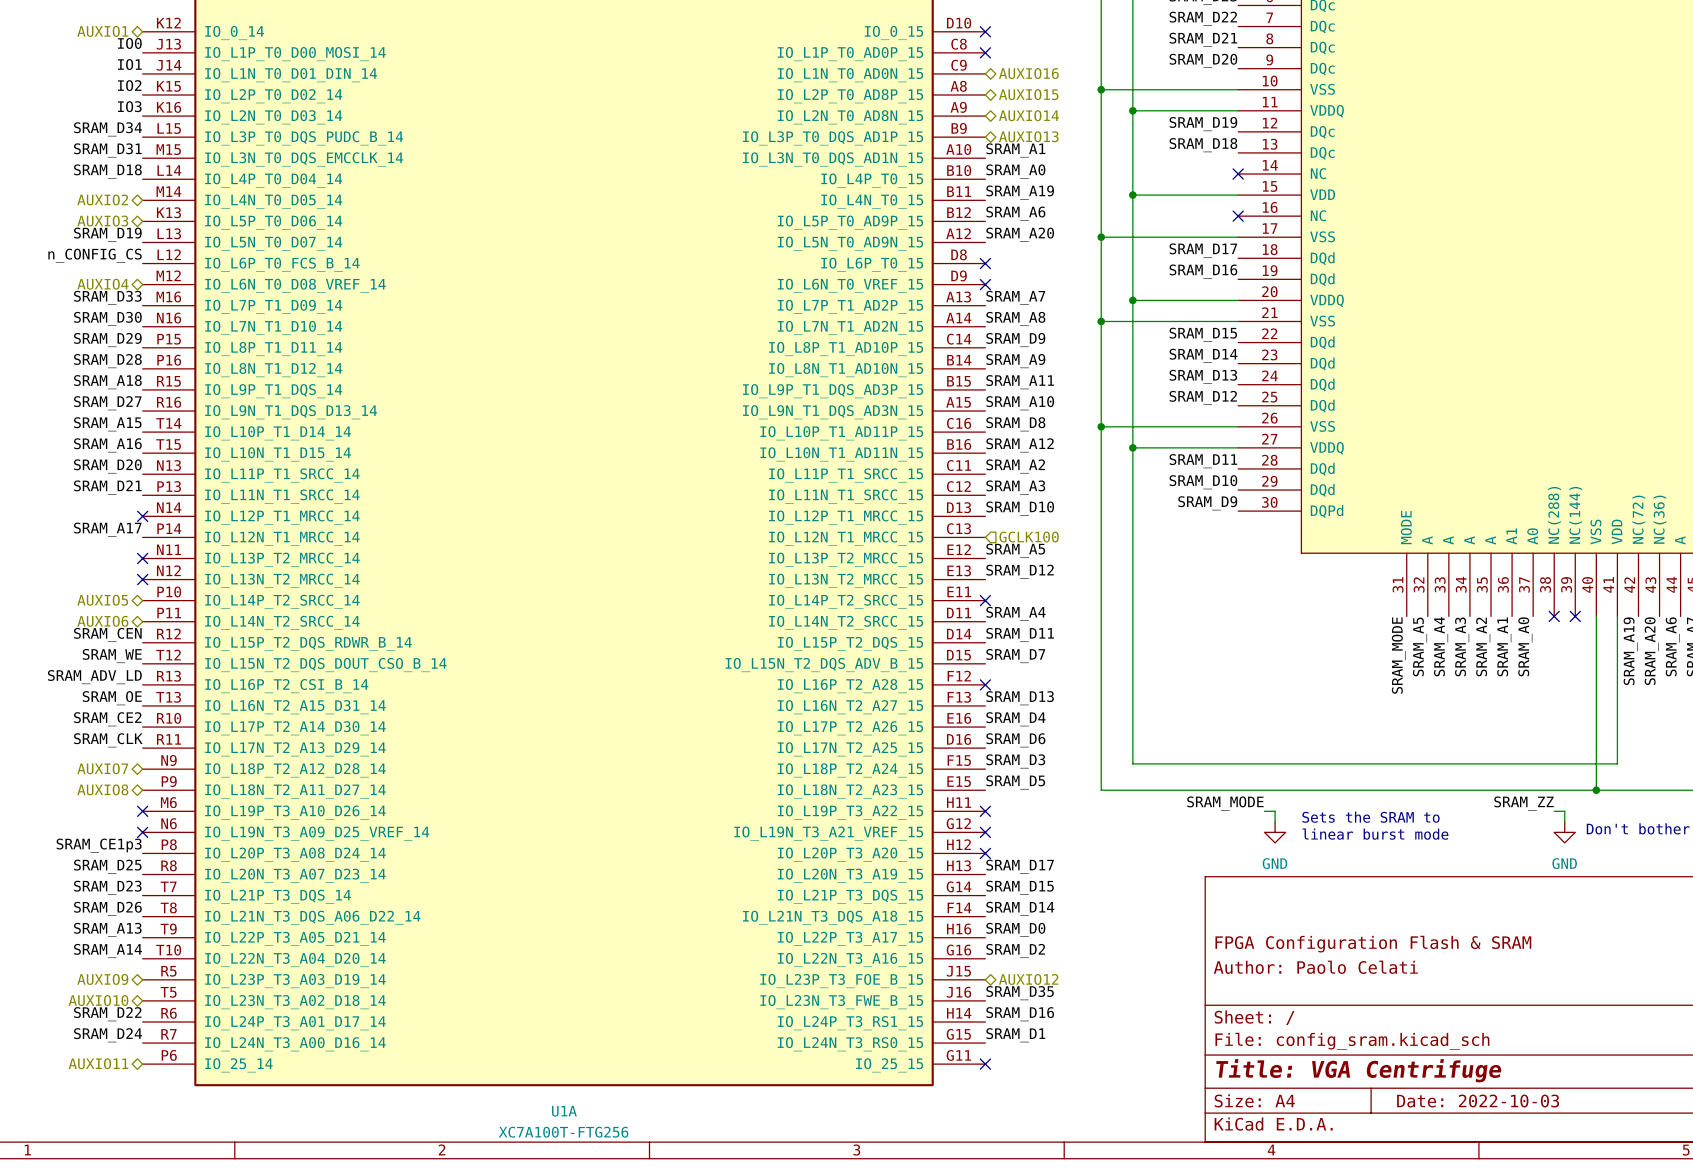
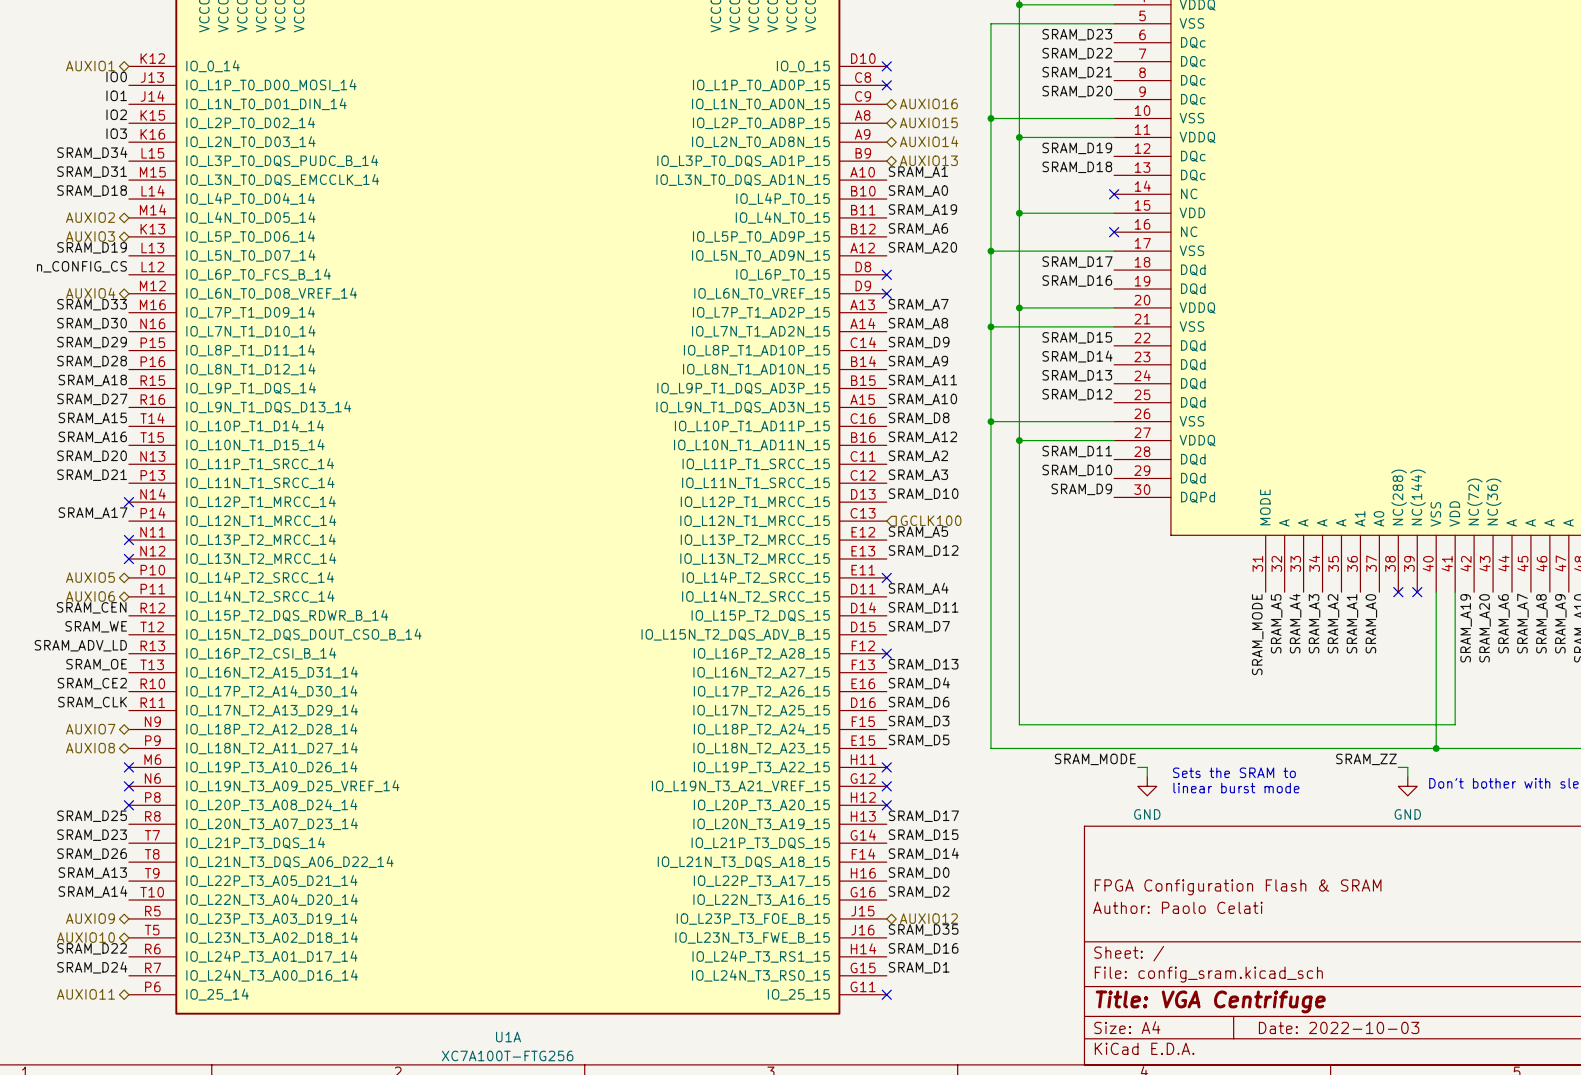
label: SRAM_CE1p3 (99, 845) -> none
no-connect mark: none -> (128, 805)

